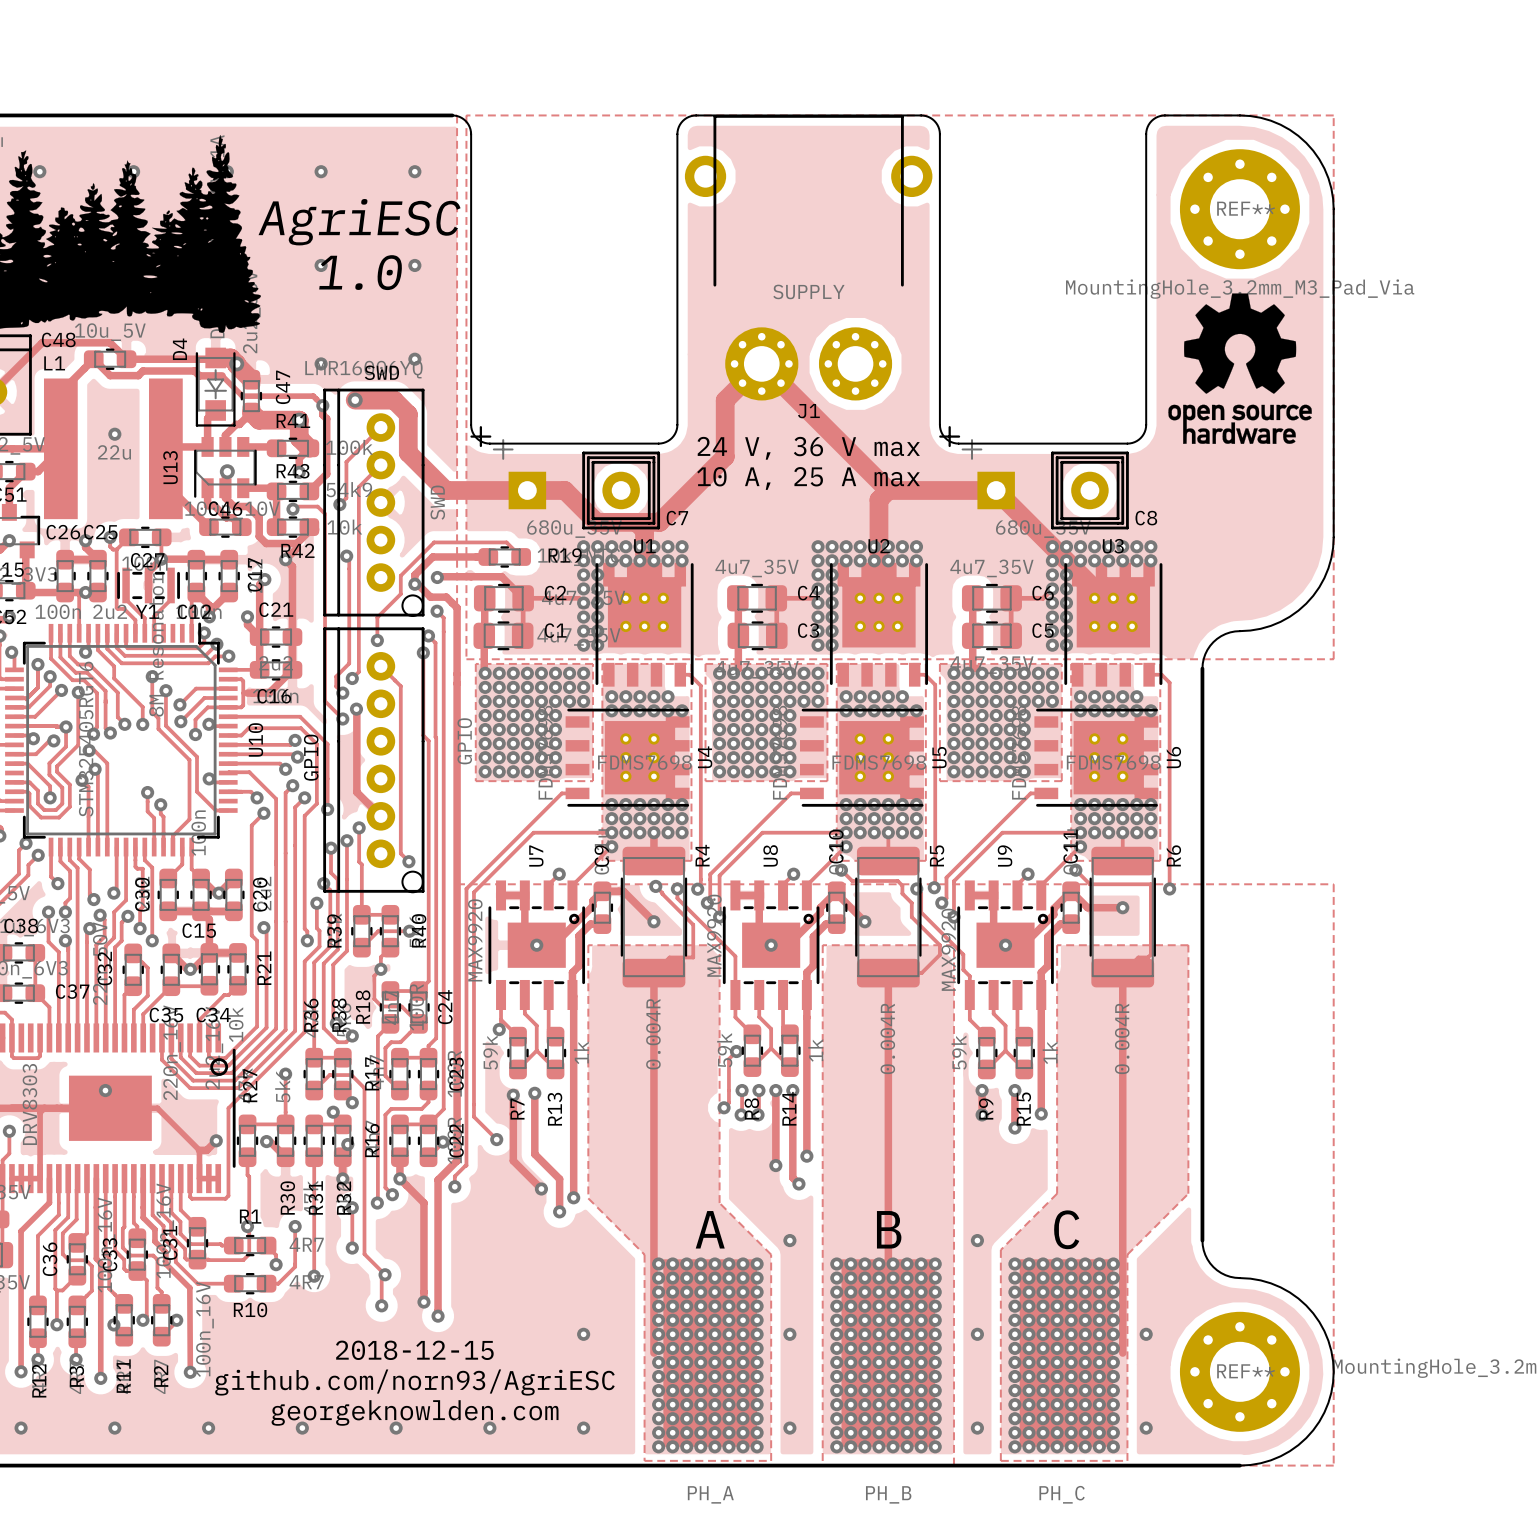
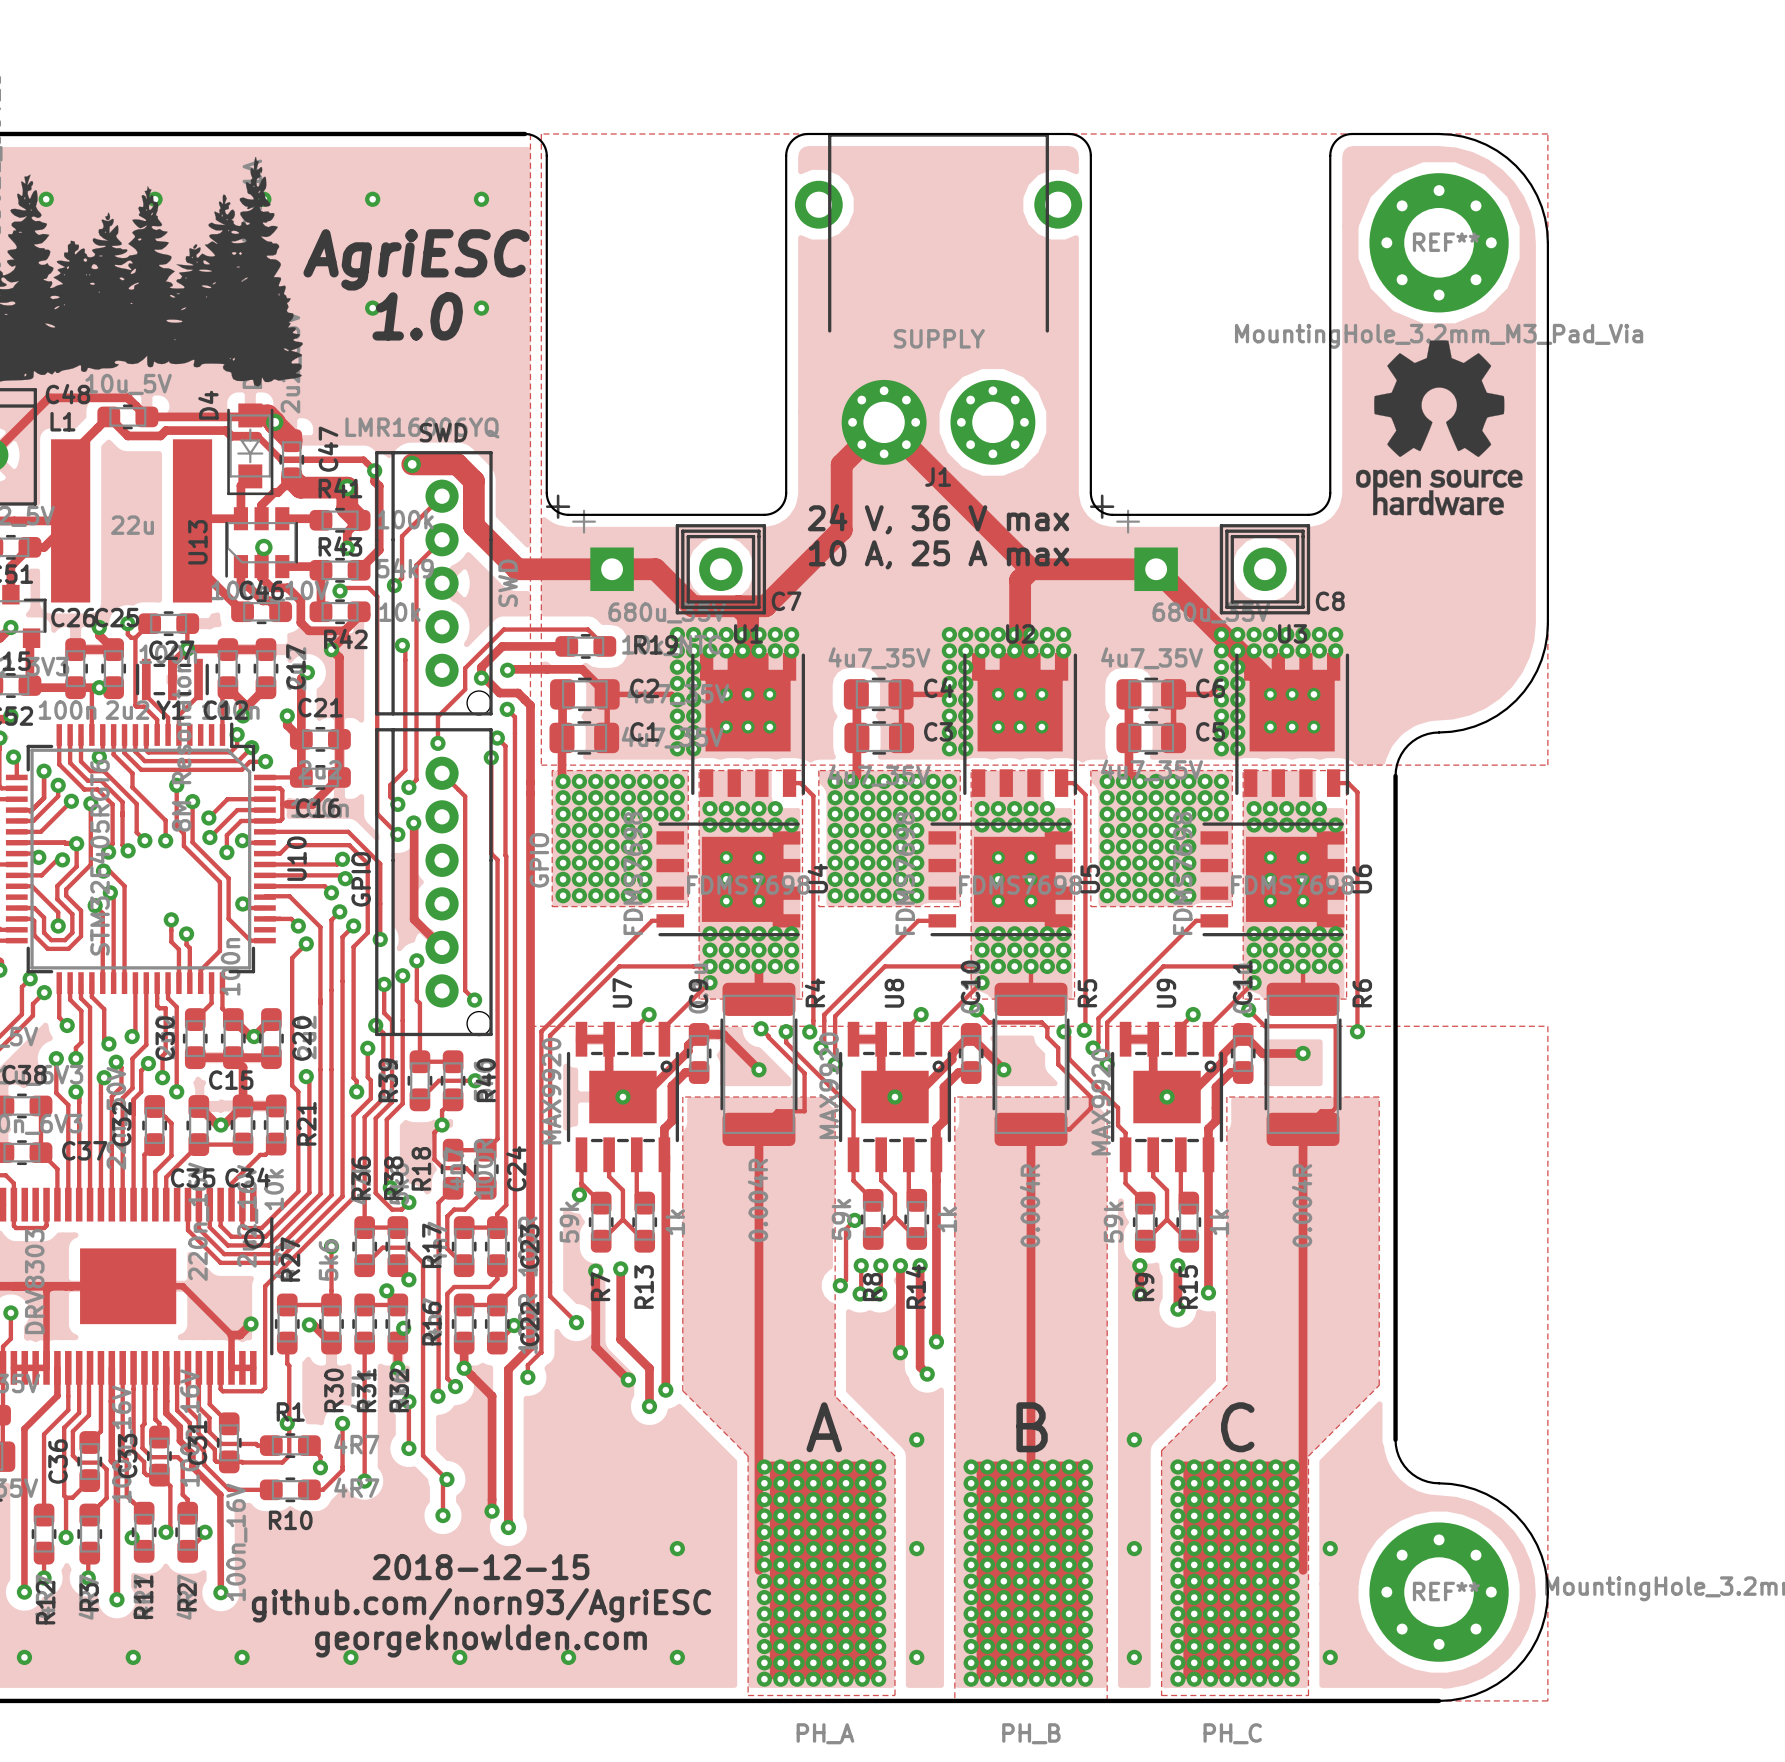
via: (414, 359) -> none
via: (321, 363) -> none
via: (114, 434) -> none
via: (105, 1090) -> none

